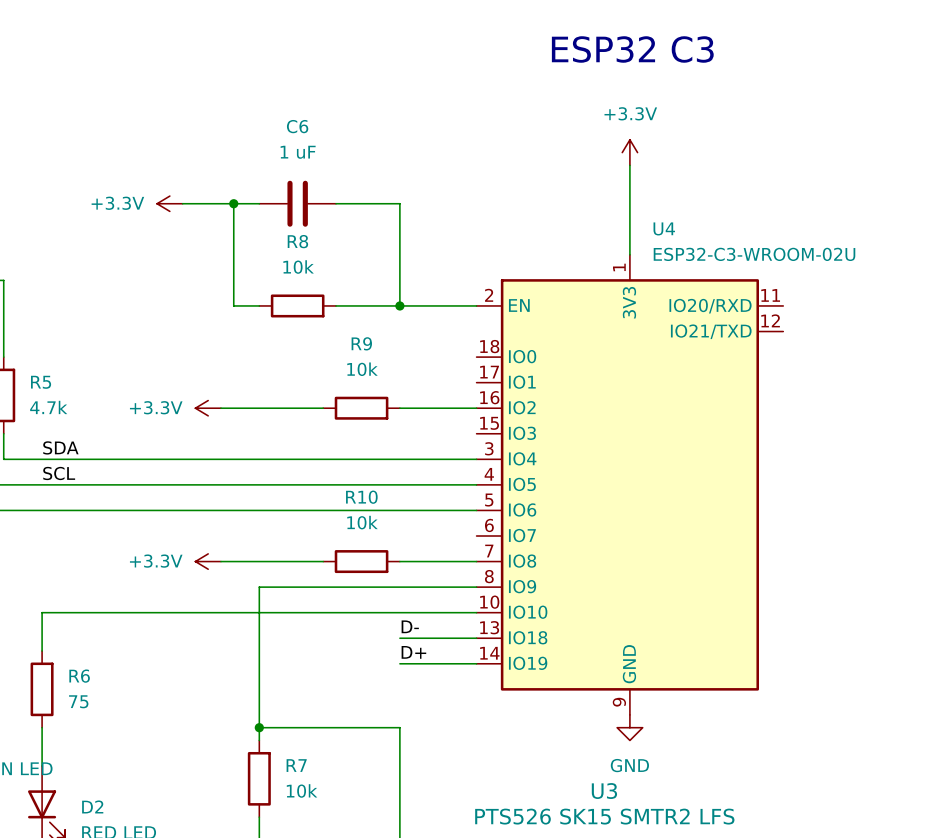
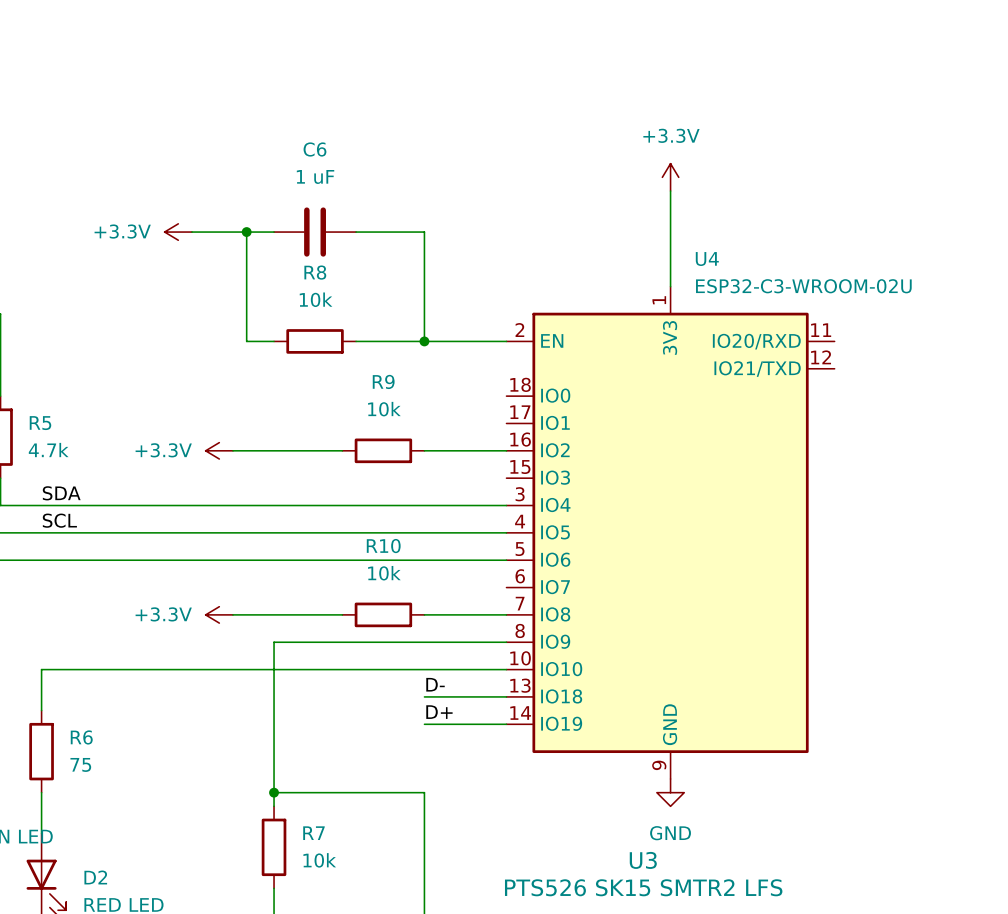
text: ESP32 C3 (632, 49) -> none

